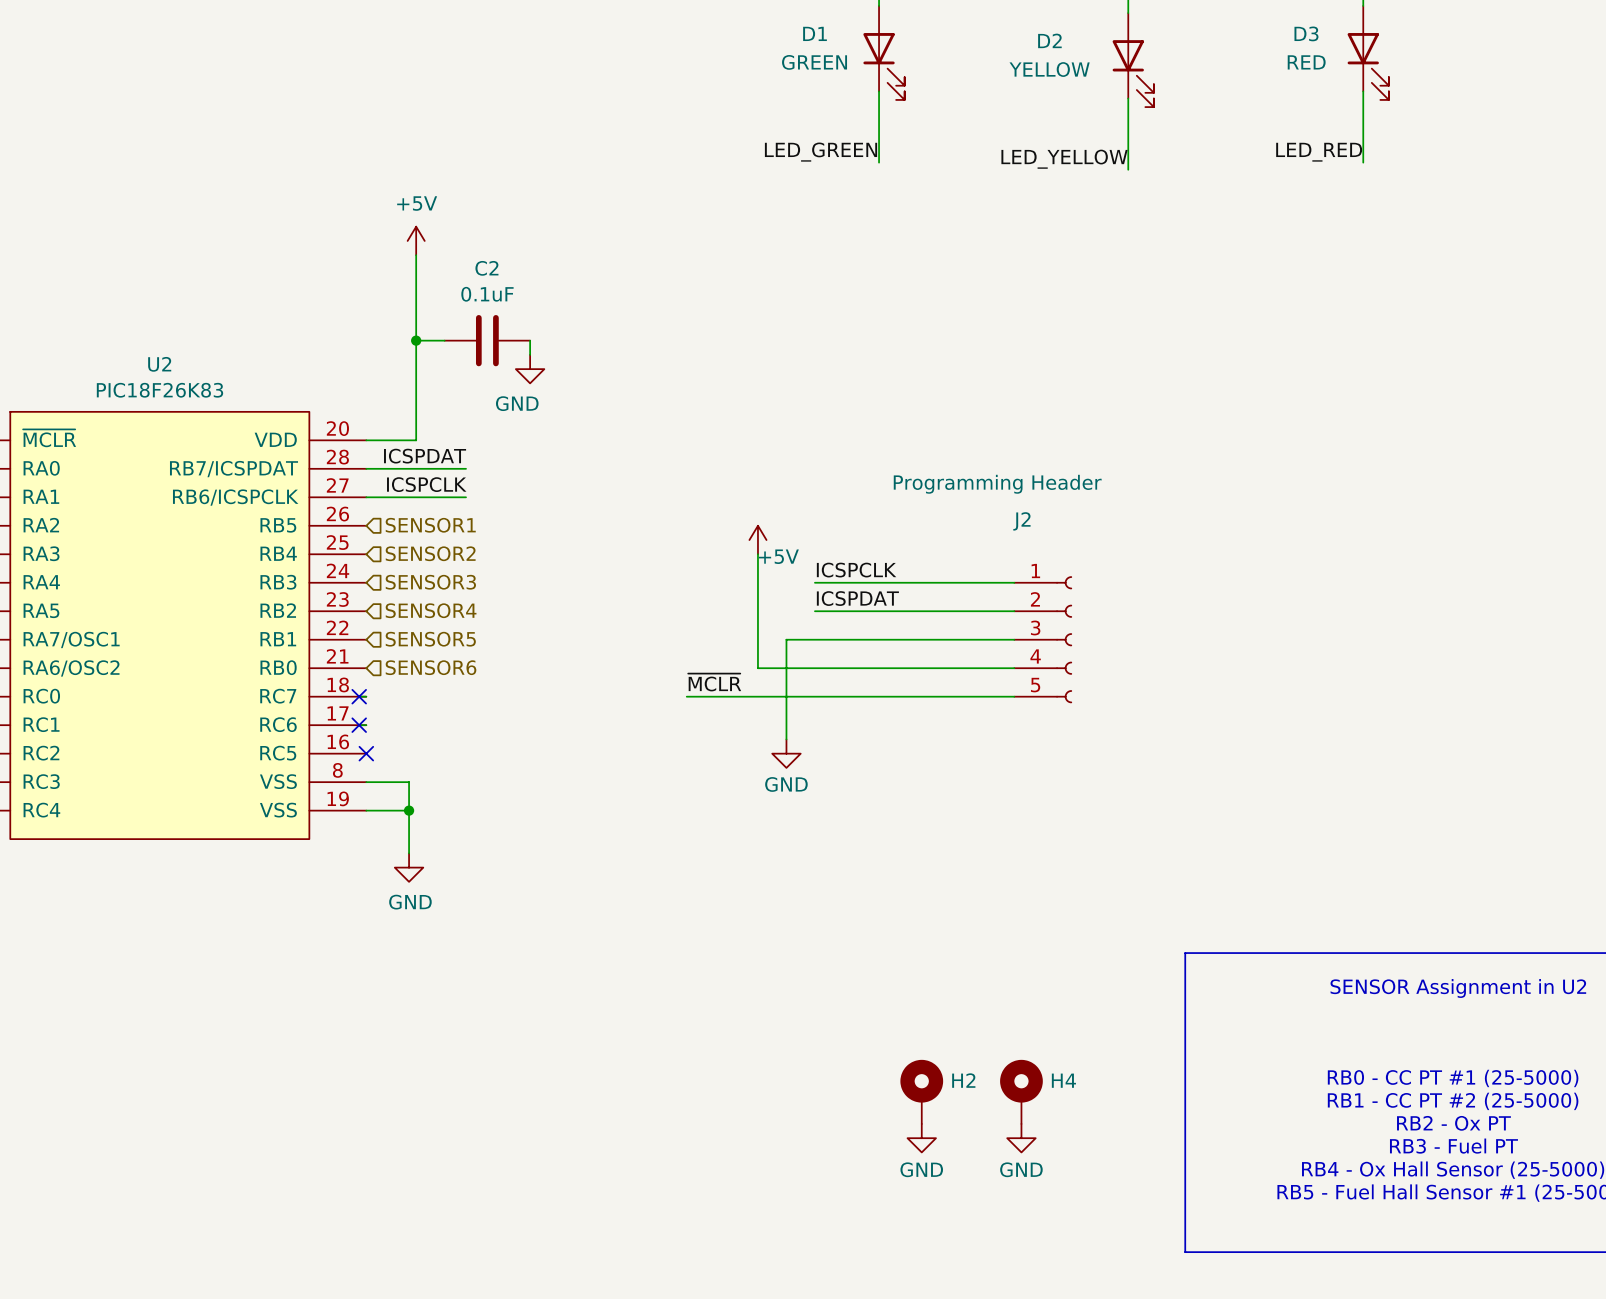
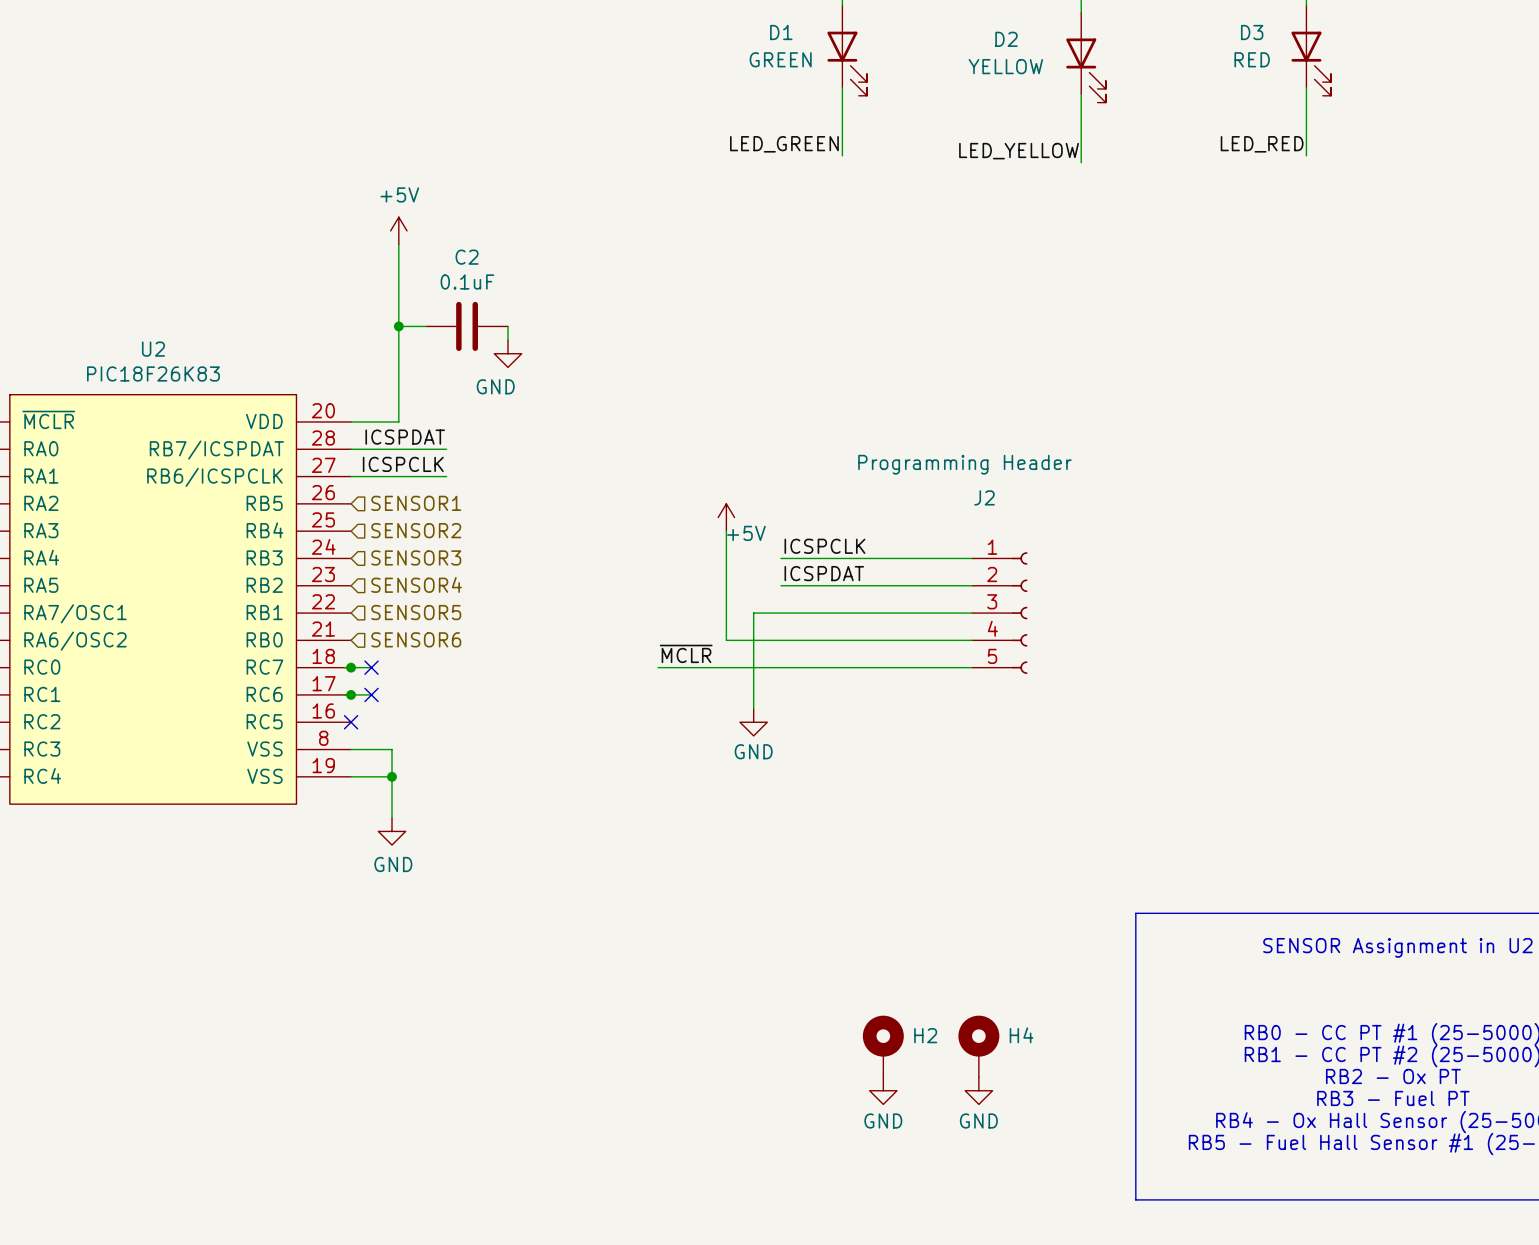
no-connect mark: (359, 696) -> none
wire: none -> (351, 667) (371, 667)
junction: none -> (351, 667)
no-connect mark: none -> (371, 667)
no-connect mark: (359, 725) -> none
wire: none -> (351, 694) (371, 694)
junction: none -> (351, 694)
no-connect mark: none -> (371, 694)

